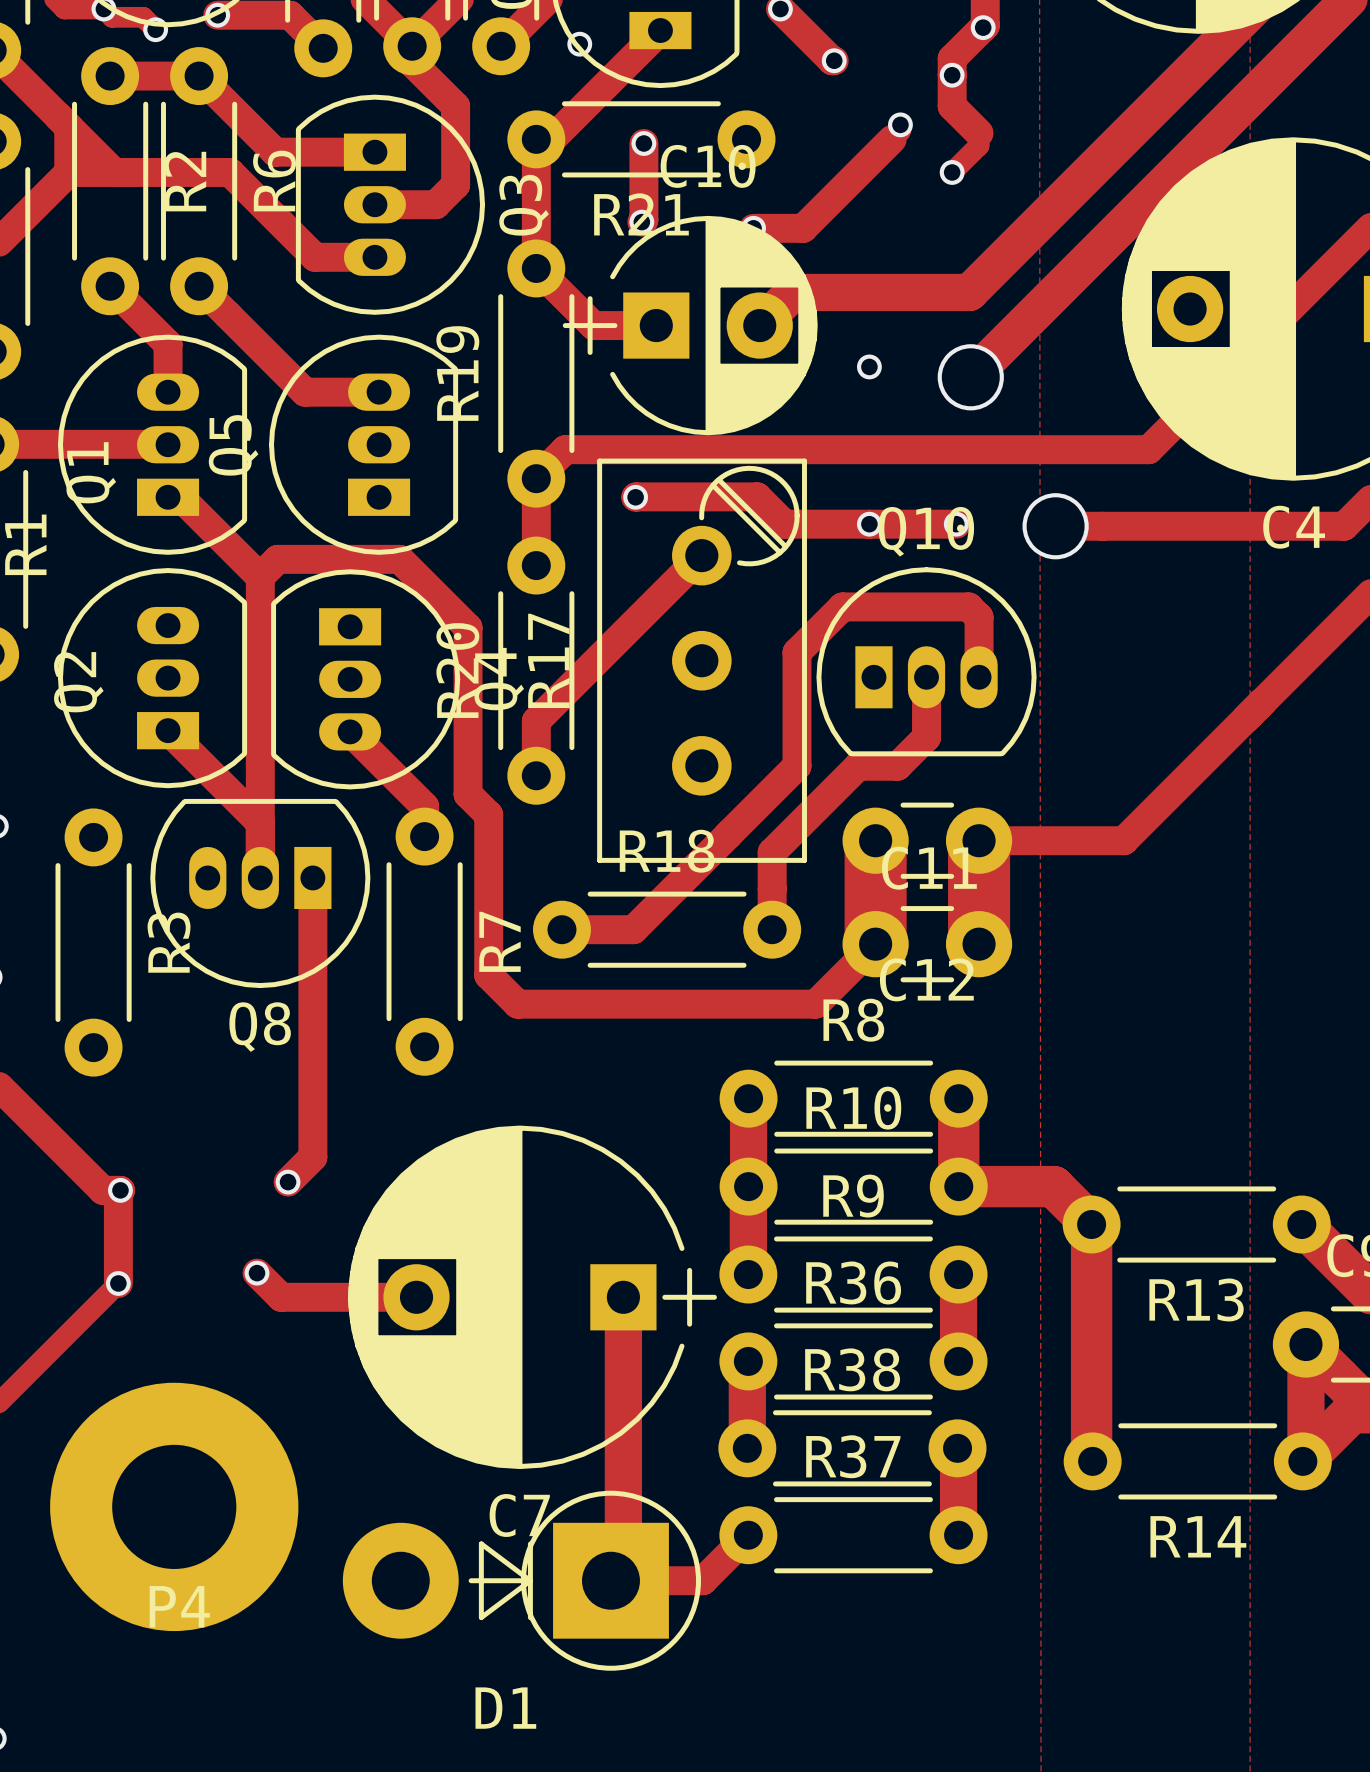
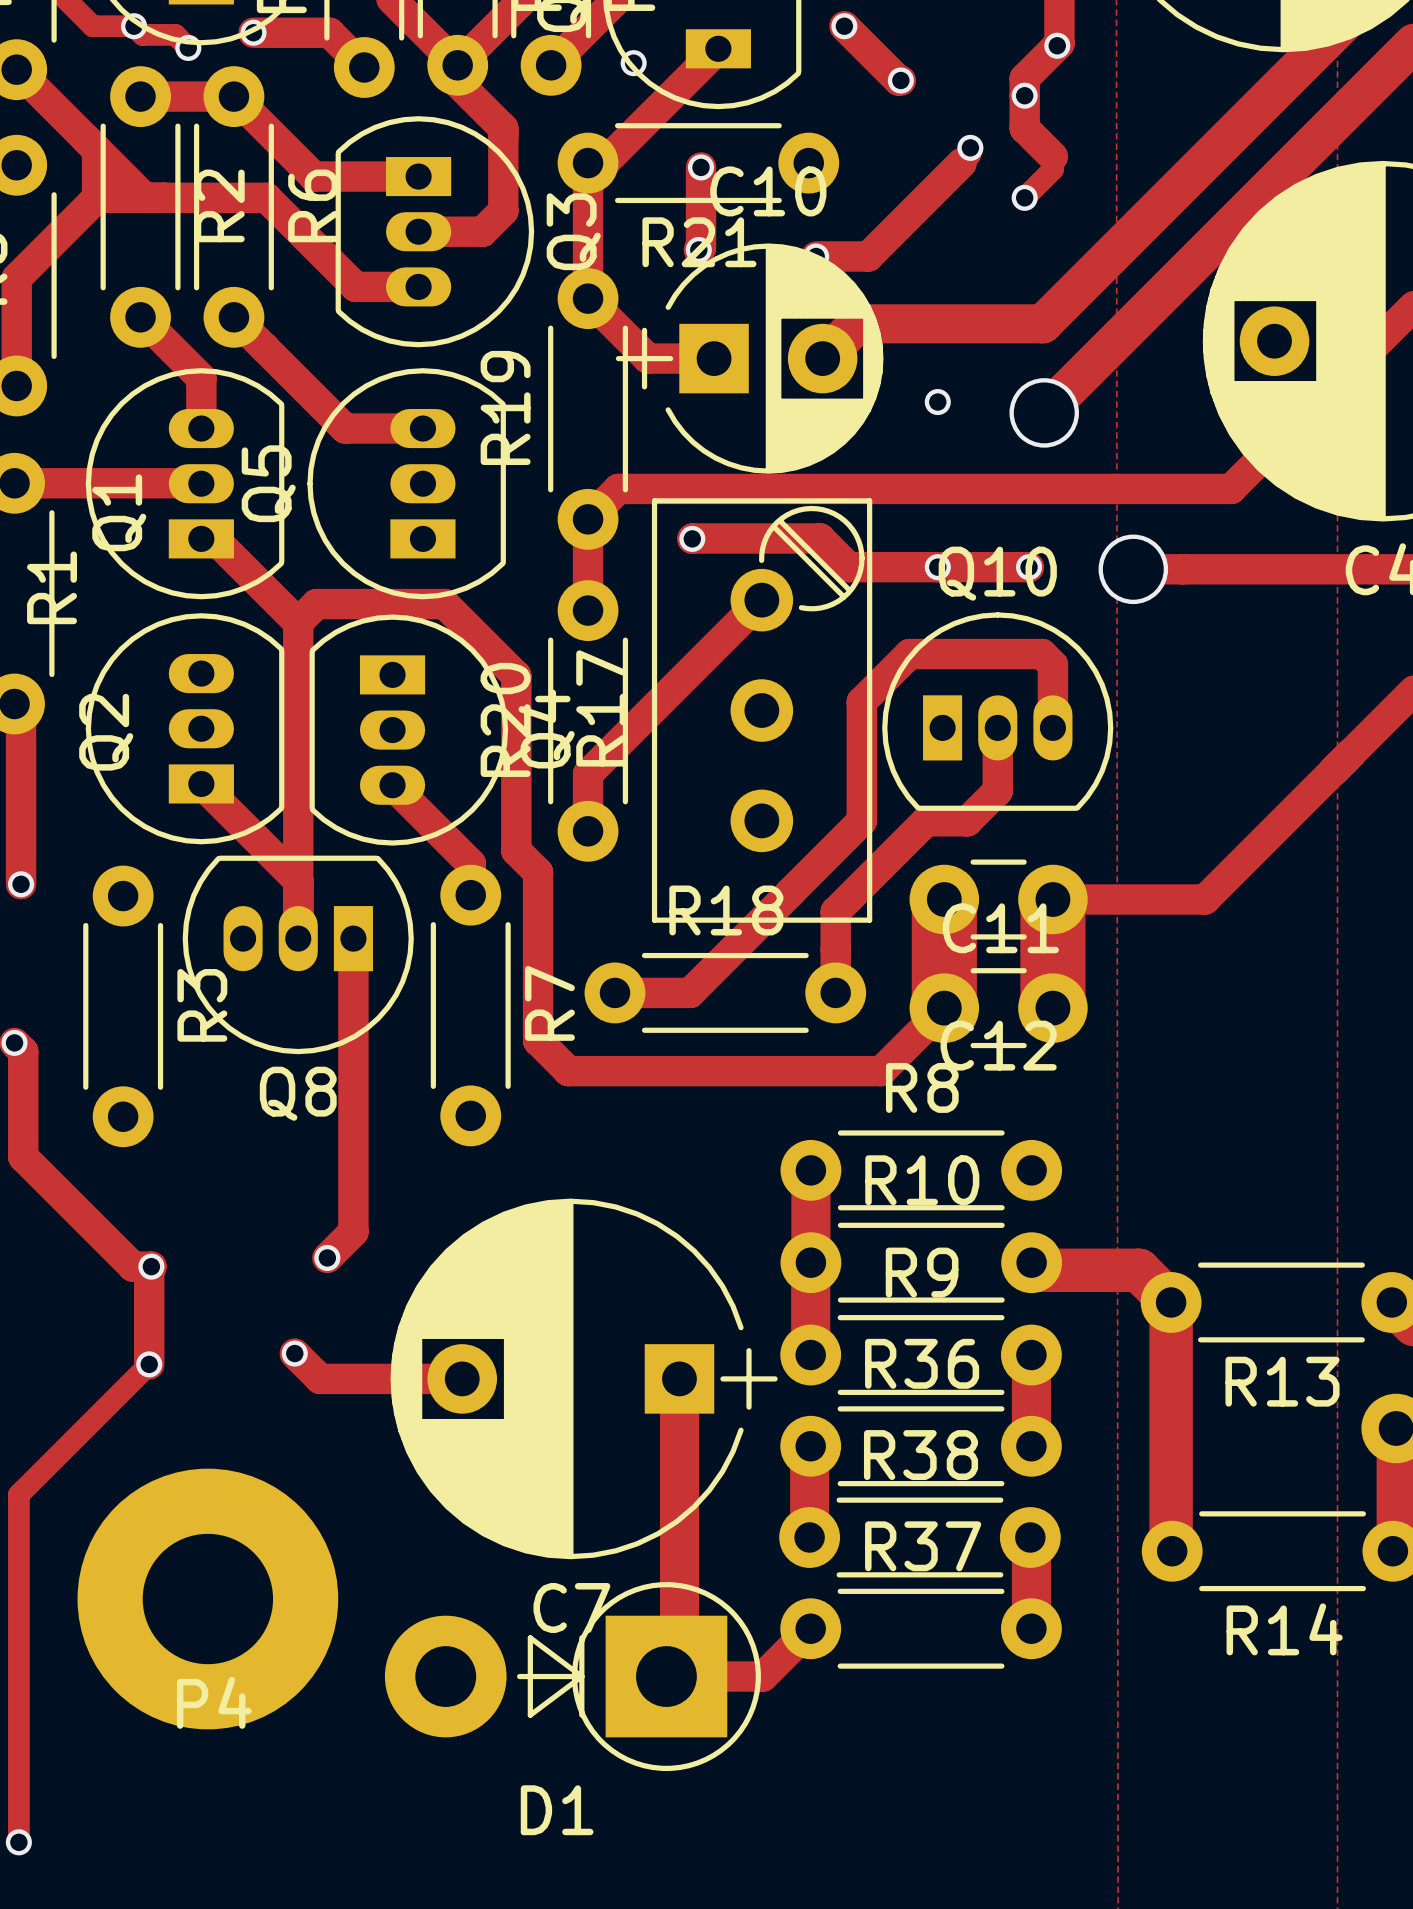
track: (958, 1098) (958, 1186) (1053, 1186) (1060, 1193) -> (1031, 1270) (1138, 1270)

